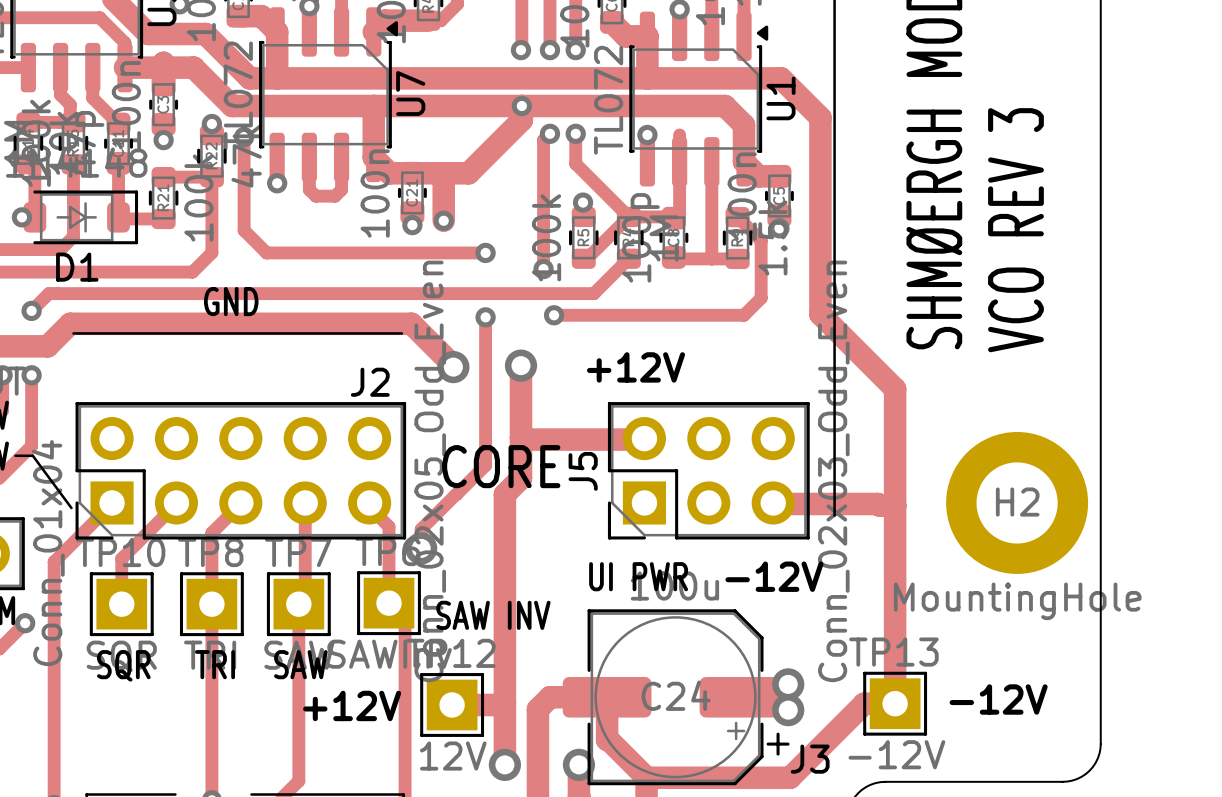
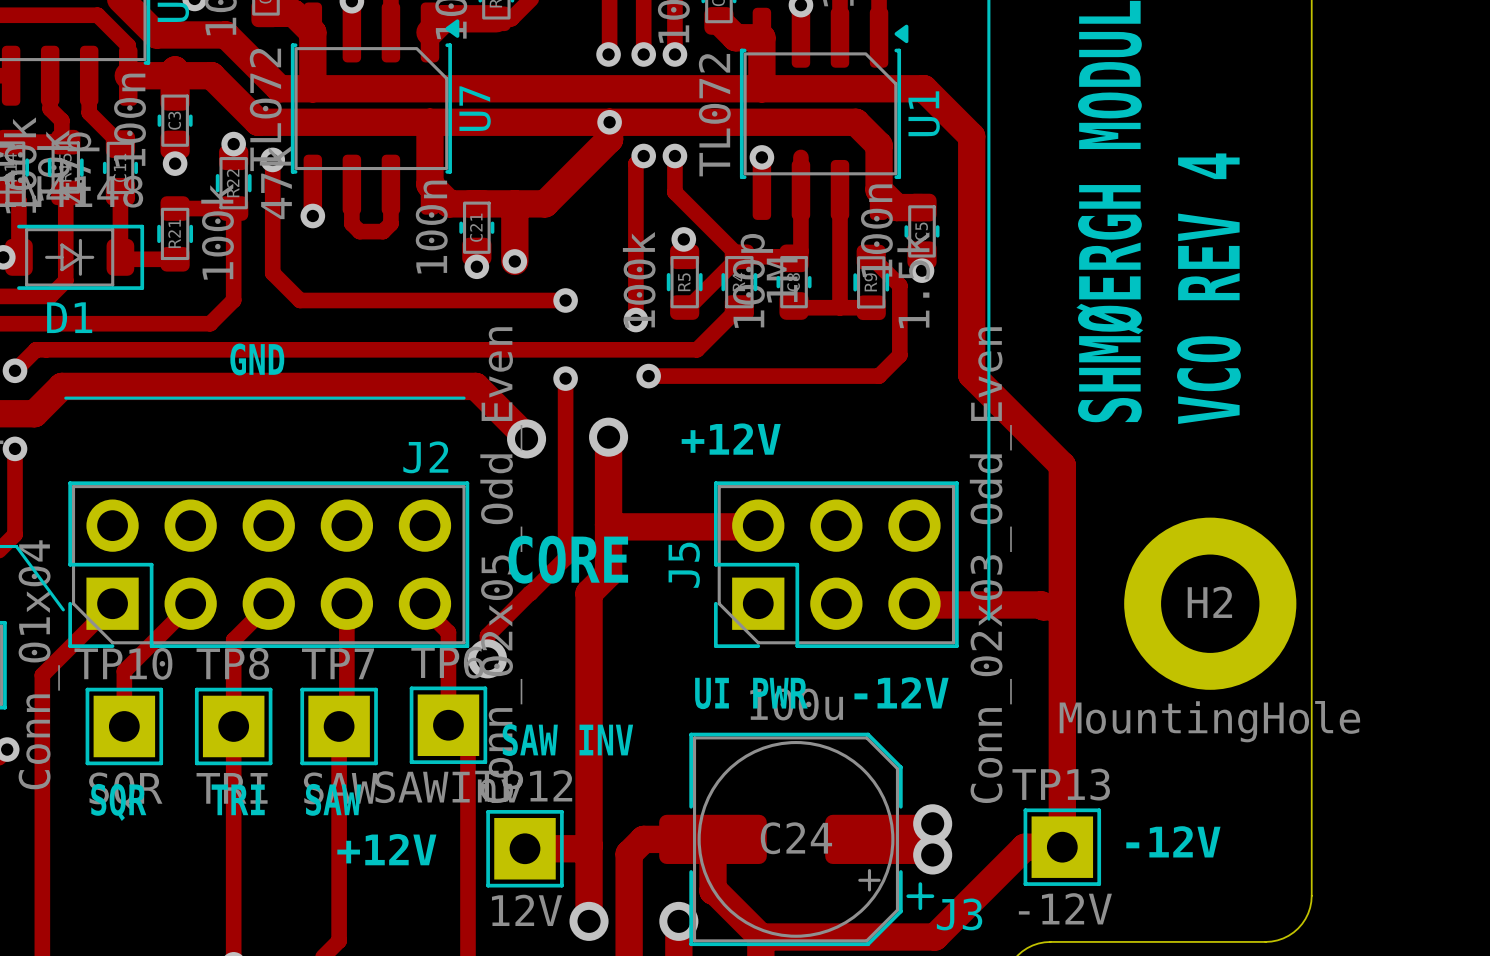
text: VCO REV 3 (1015, 230) -> VCO REV 4 (1208, 288)

